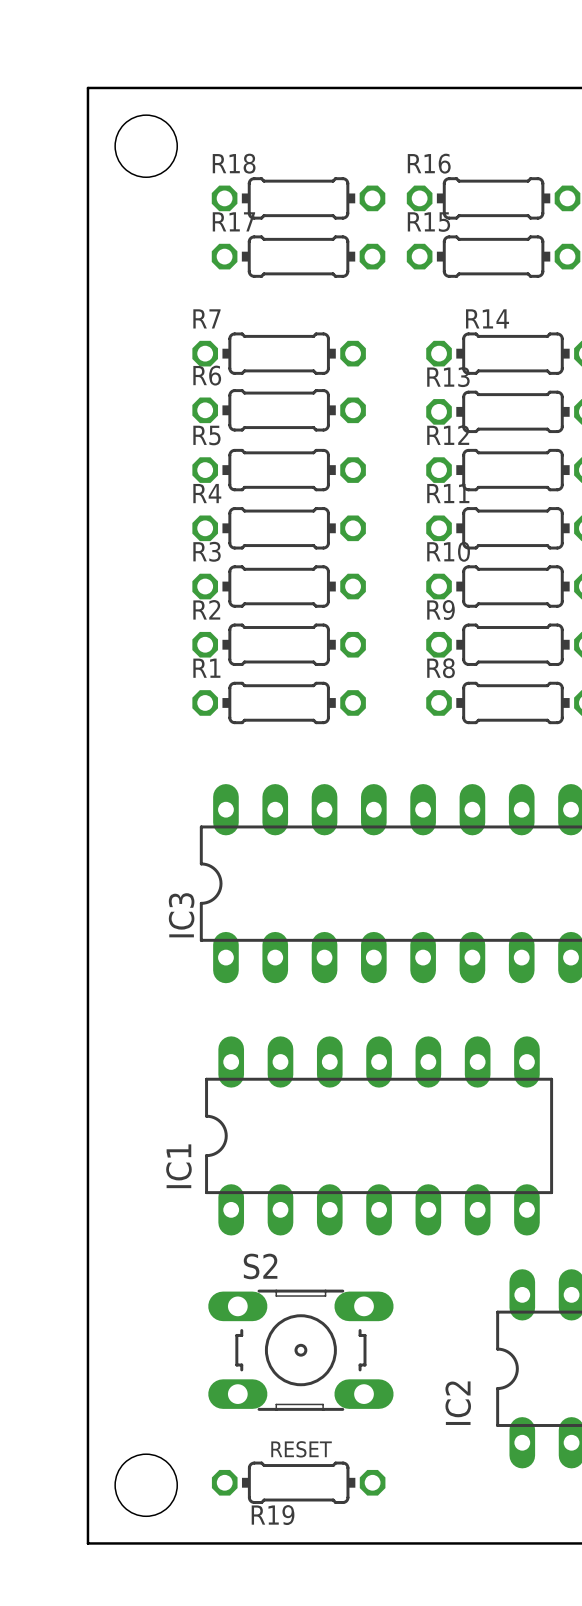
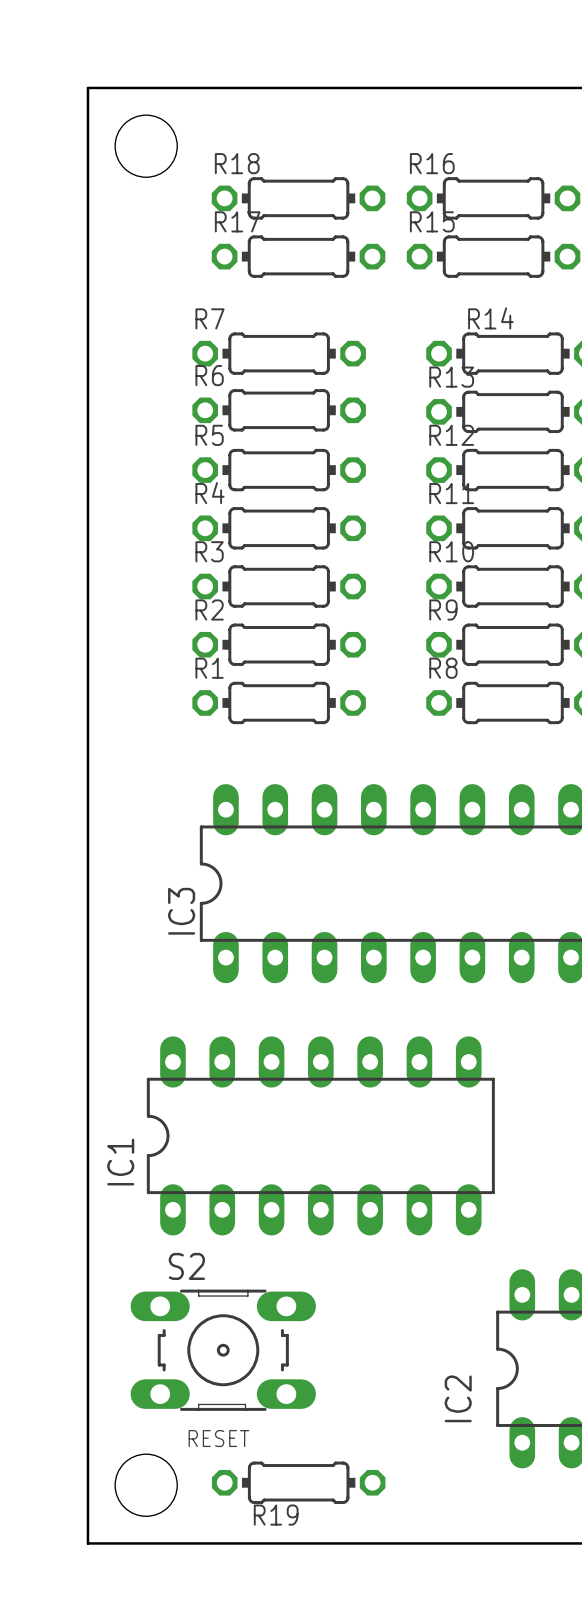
IC1 position: (379, 1135) -> (320, 1135)
S2 position: (300, 1350) -> (223, 1350)
text position: RESET (301, 1449) -> RESET (218, 1438)

